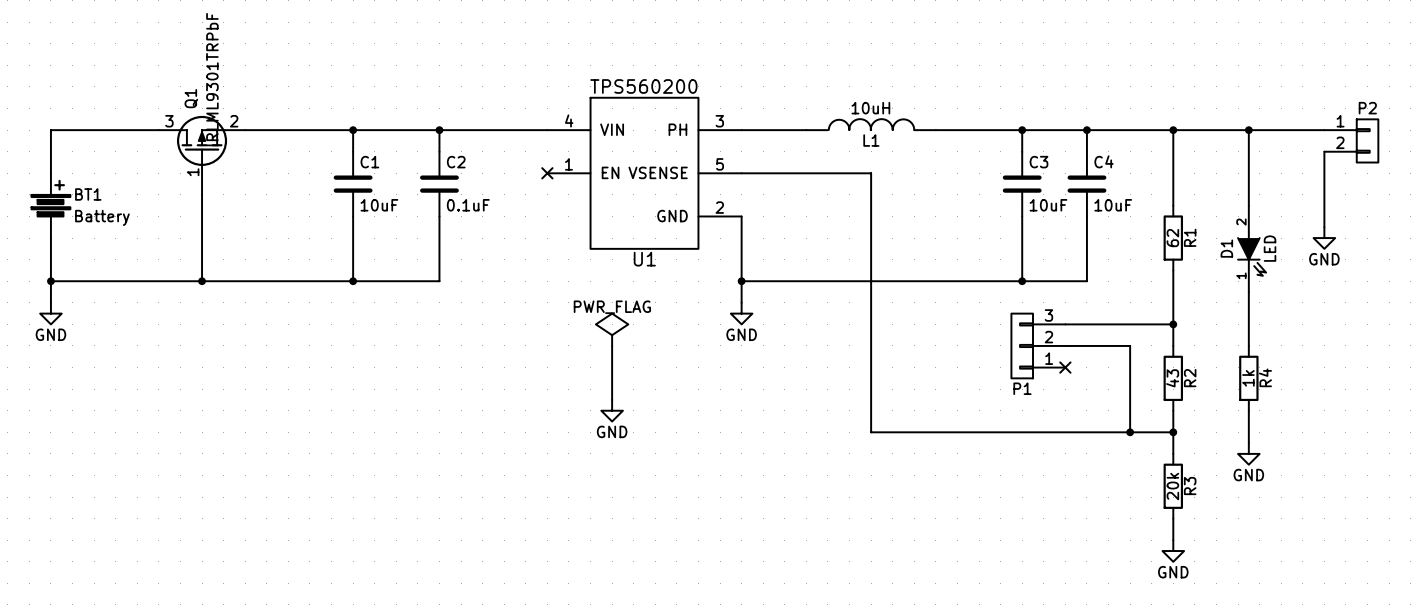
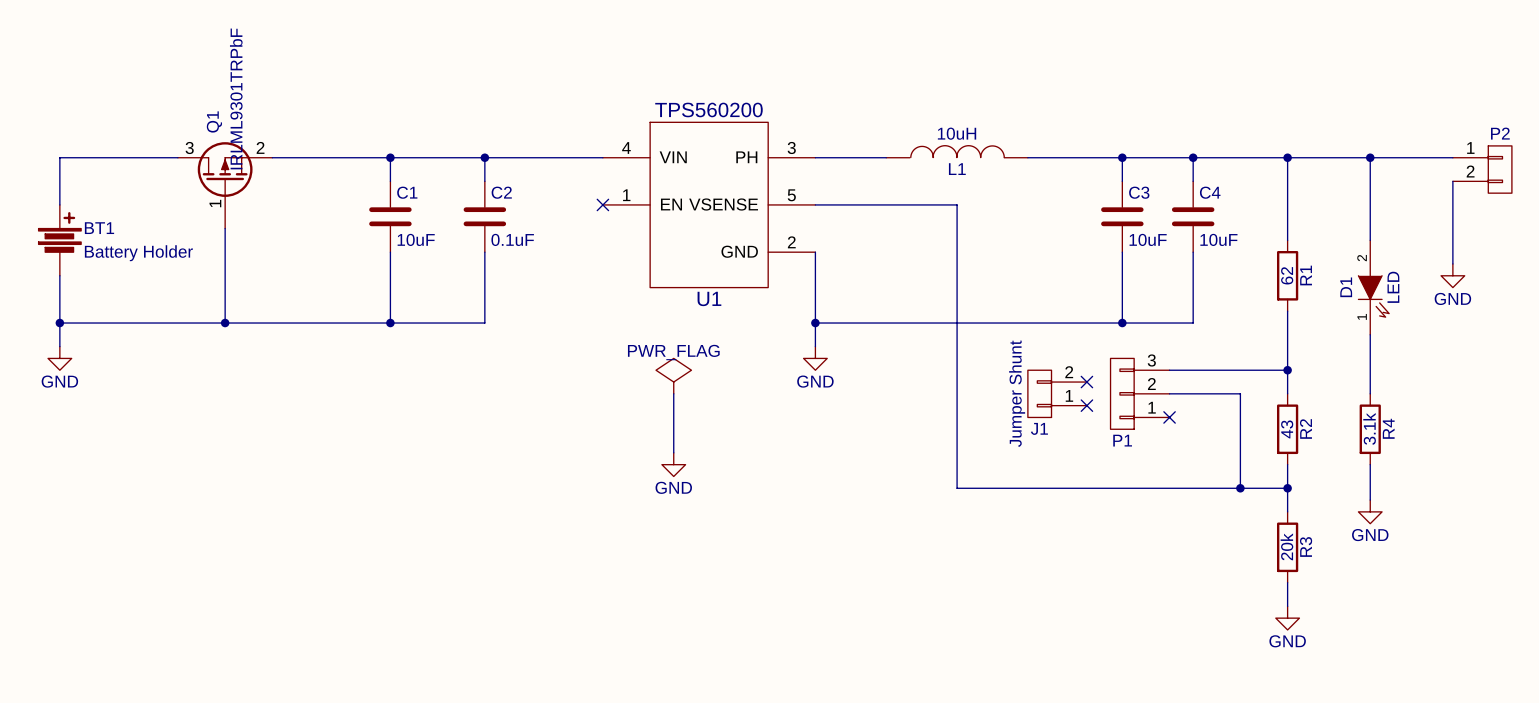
BT1 value: Battery (102, 217) -> Battery Holder (138, 253)
no-connect mark: none -> (1086, 382)
J1: none -> Jumper Shunt (1057, 393)
no-connect mark: none -> (1086, 405)
R4 value: 1k (1248, 378) -> 3.1k (1369, 428)

